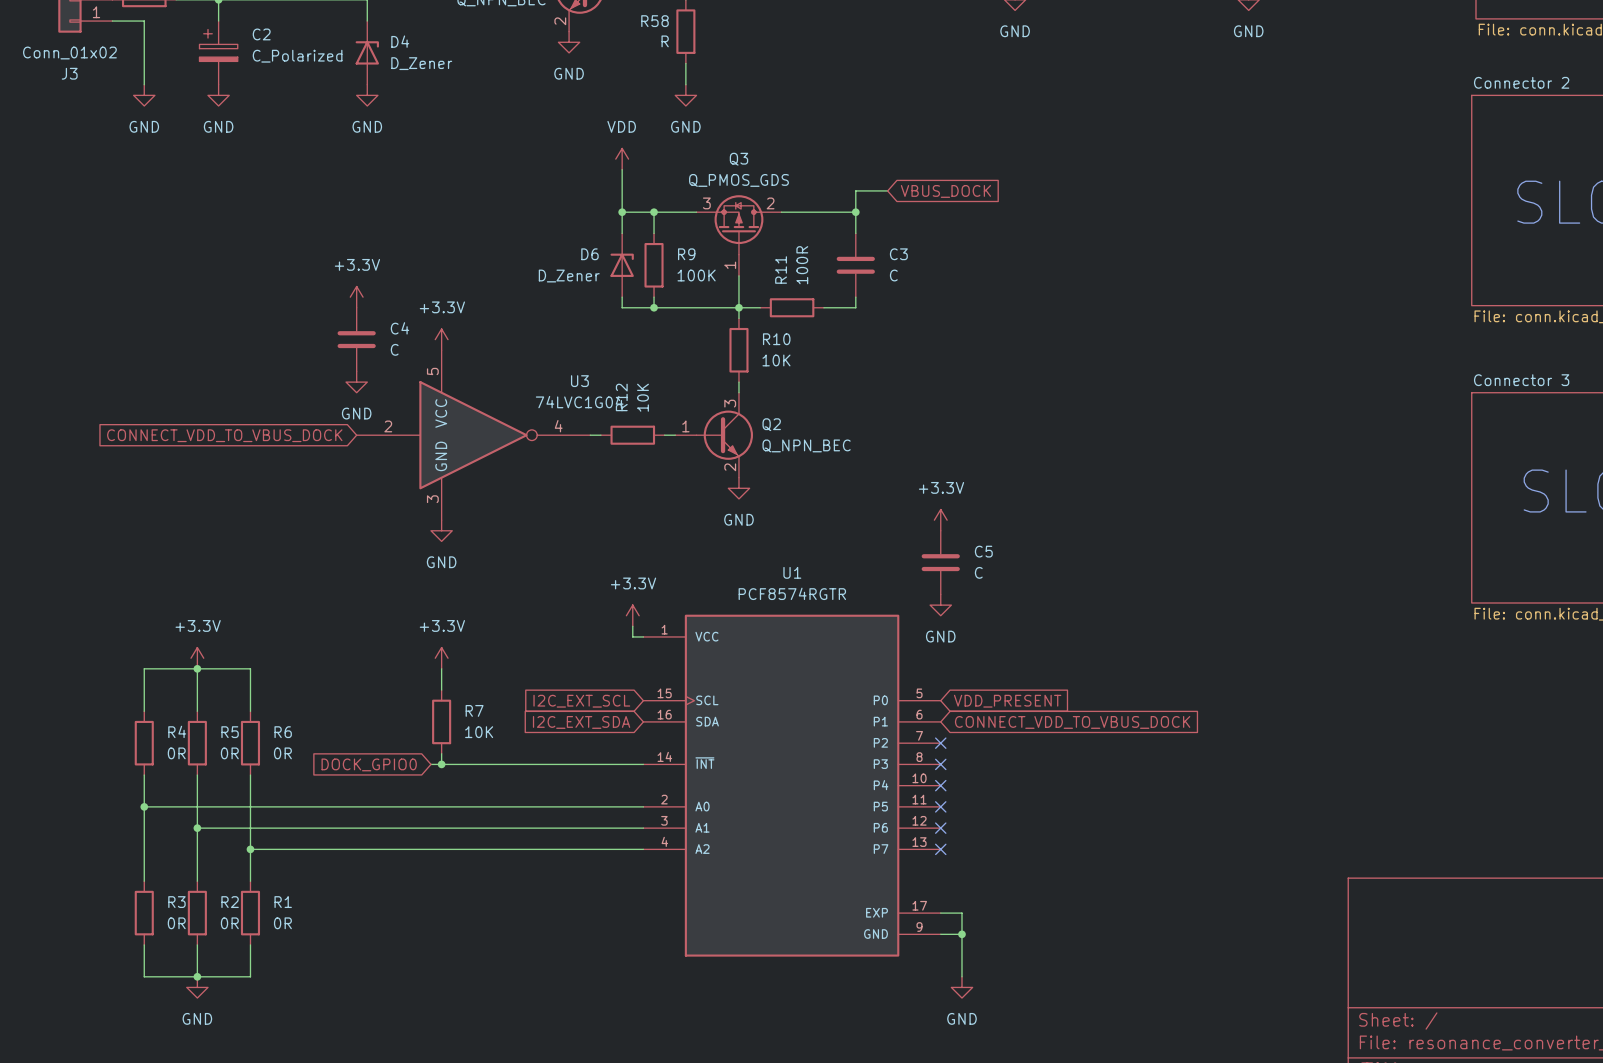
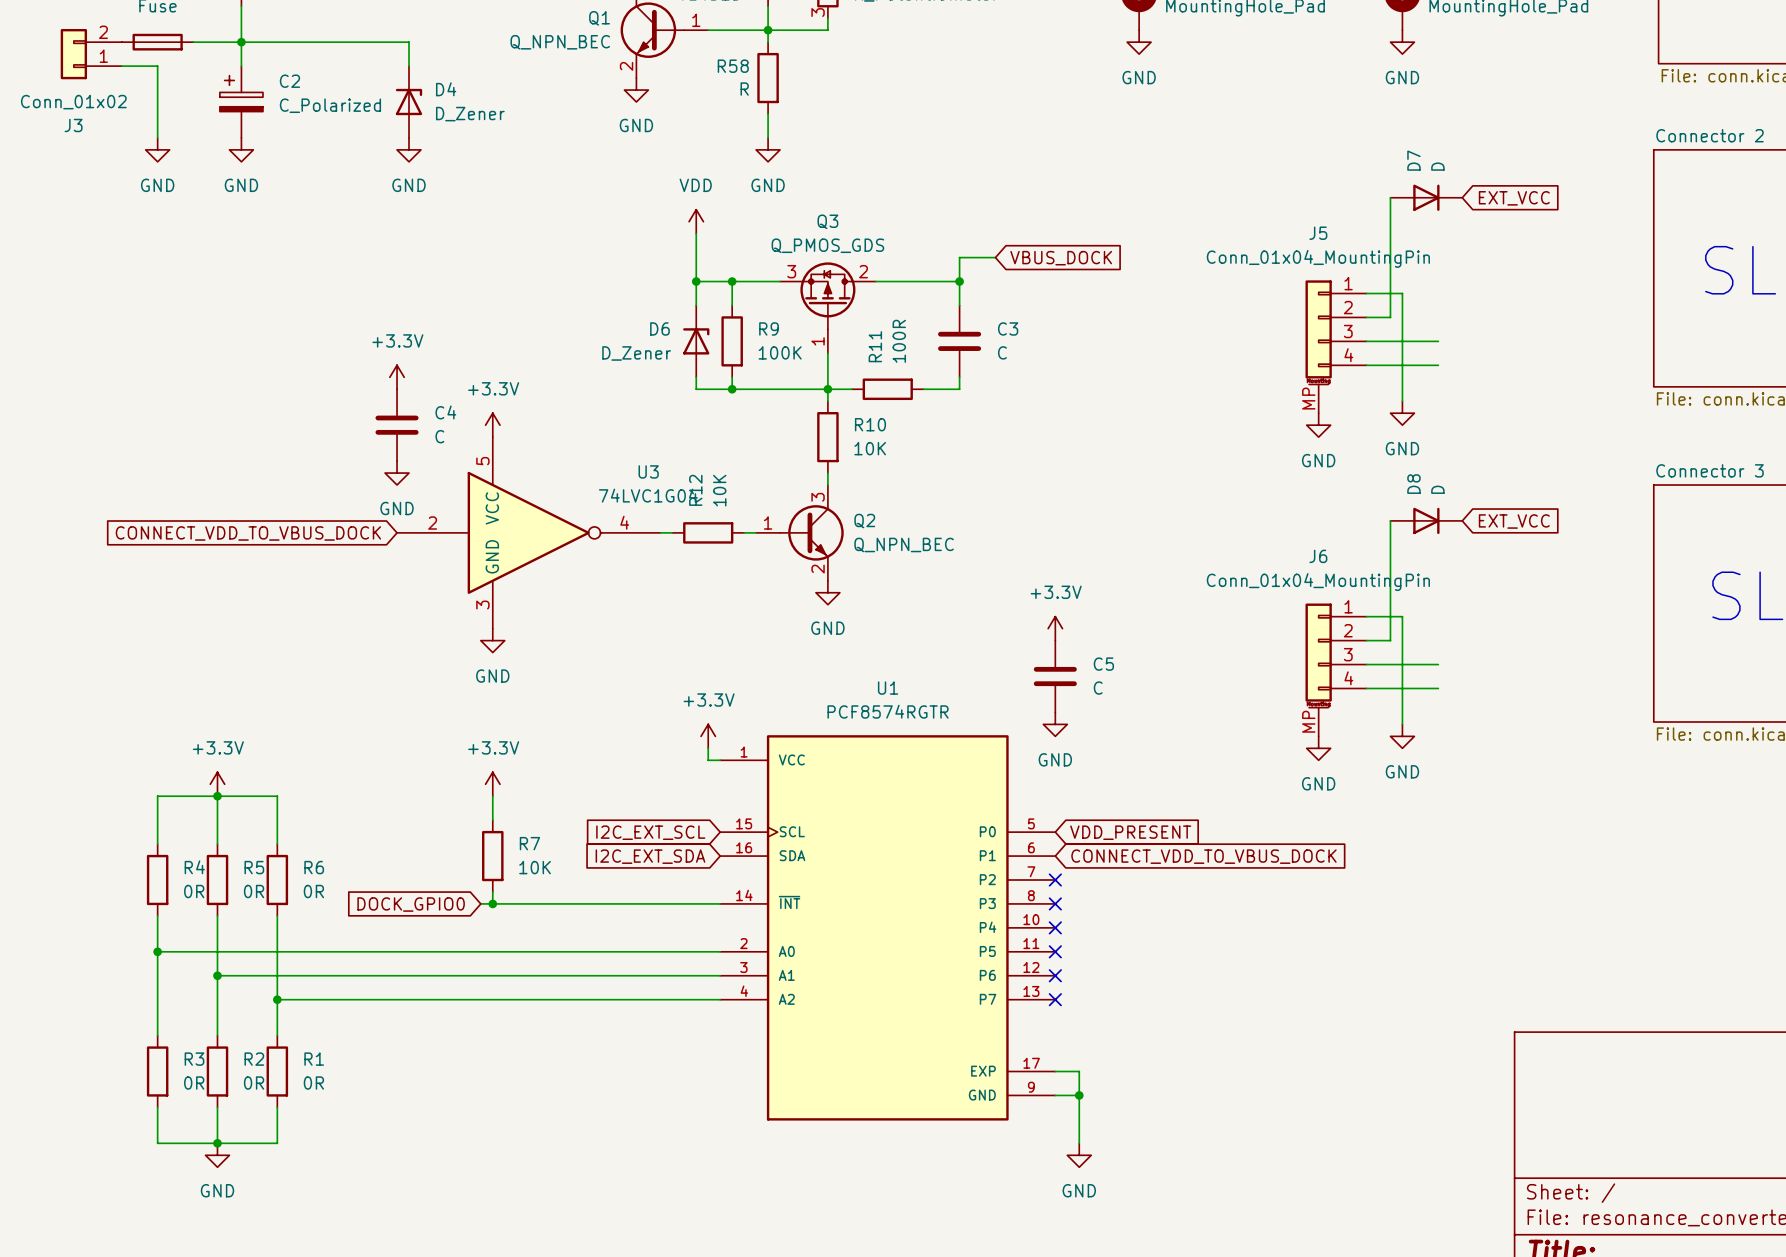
wire: none -> (1390, 197) (1390, 317) (1366, 317)
D7: none -> D (1426, 197)
global label: none -> EXT_VCC (1514, 198)
wire: none -> (1366, 293) (1402, 293) (1402, 401)
wire: none -> (1366, 341) (1438, 341)
J5: none -> Conn_01x04_MountingPin (1336, 346)
wire: none -> (1366, 365) (1438, 365)
power symbol: none -> GND (1402, 413)
power symbol: none -> GND (1318, 425)
wire: none -> (1390, 520) (1390, 640) (1366, 640)
D8: none -> D (1426, 520)
global label: none -> EXT_VCC (1514, 521)
wire: none -> (1366, 616) (1402, 616) (1402, 724)
wire: none -> (1366, 664) (1438, 664)
J6: none -> Conn_01x04_MountingPin (1336, 669)
wire: none -> (1366, 688) (1438, 688)
power symbol: none -> GND (1402, 736)
power symbol: none -> GND (1318, 748)

